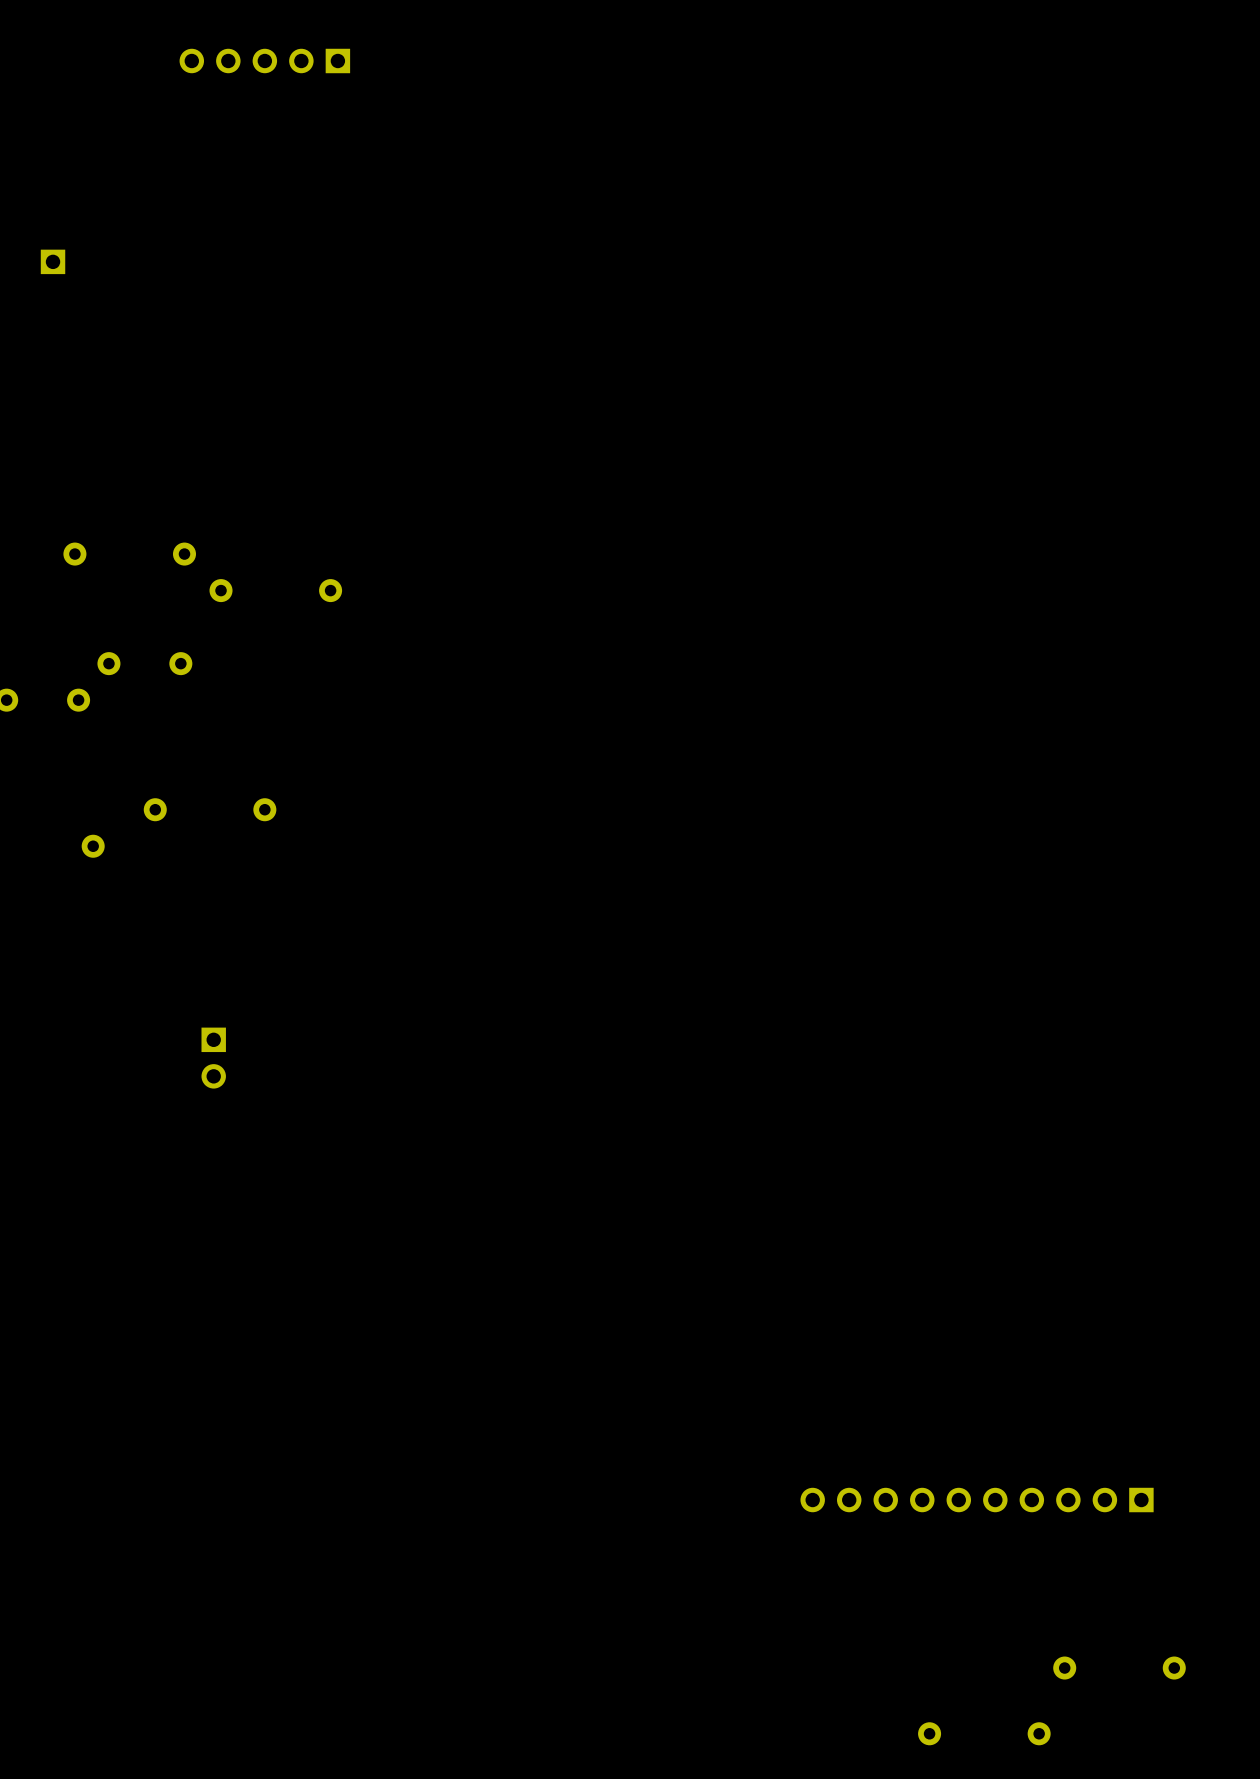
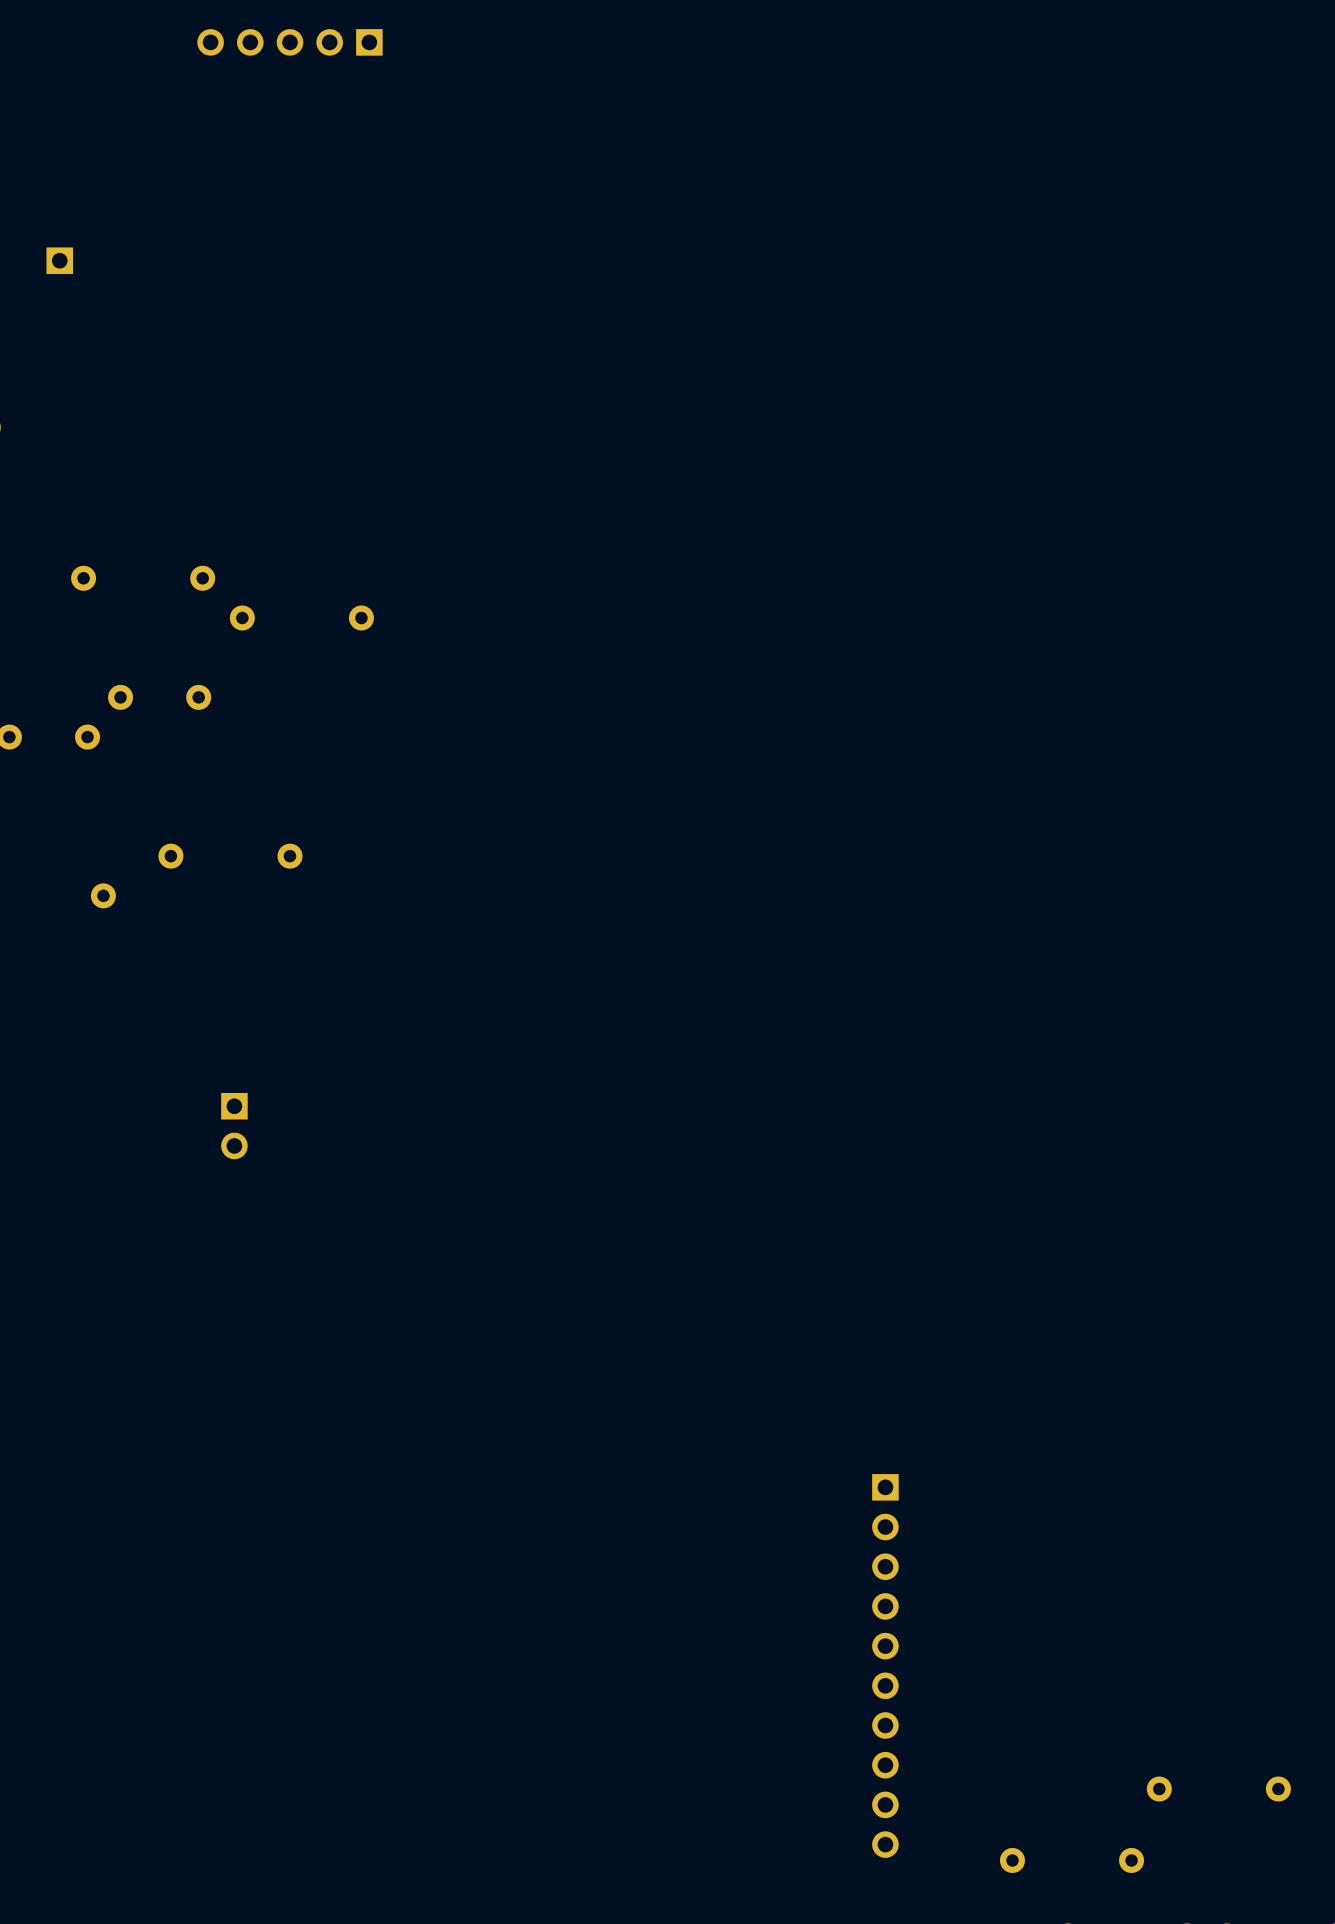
part rotation: 0° (977, 1500) -> 90° counterclockwise (885, 1665)

